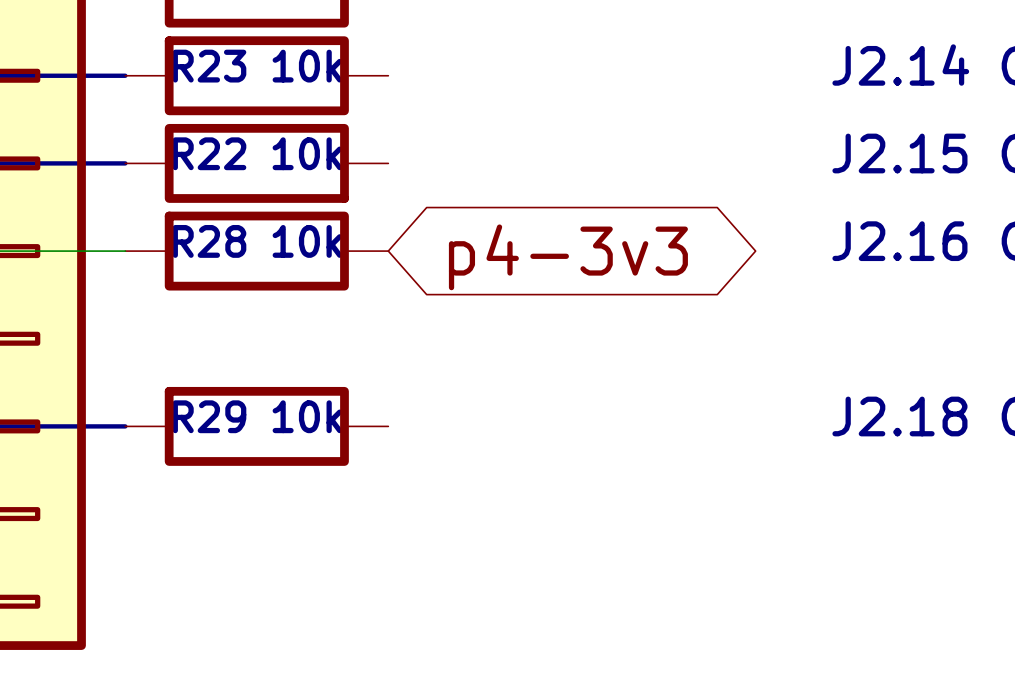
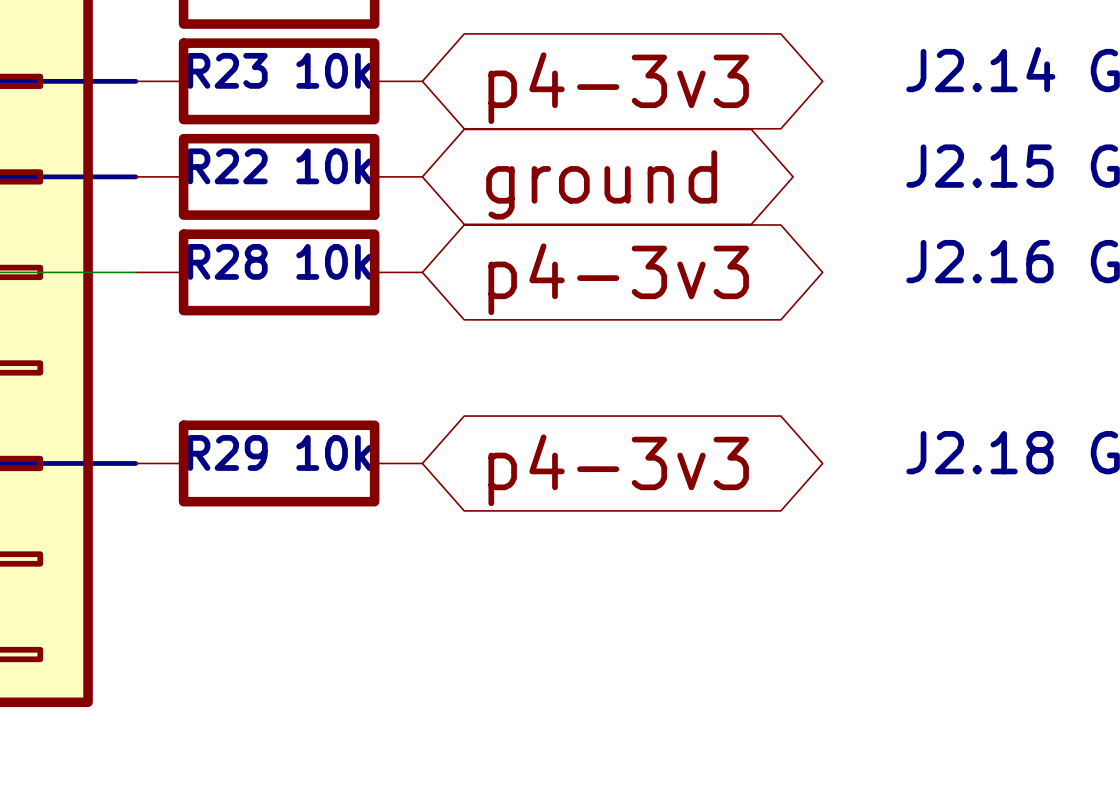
global label: none -> p4-3v3 (618, 88)
global label: none -> ground (601, 184)
global label: none -> p4-3v3 (618, 470)

